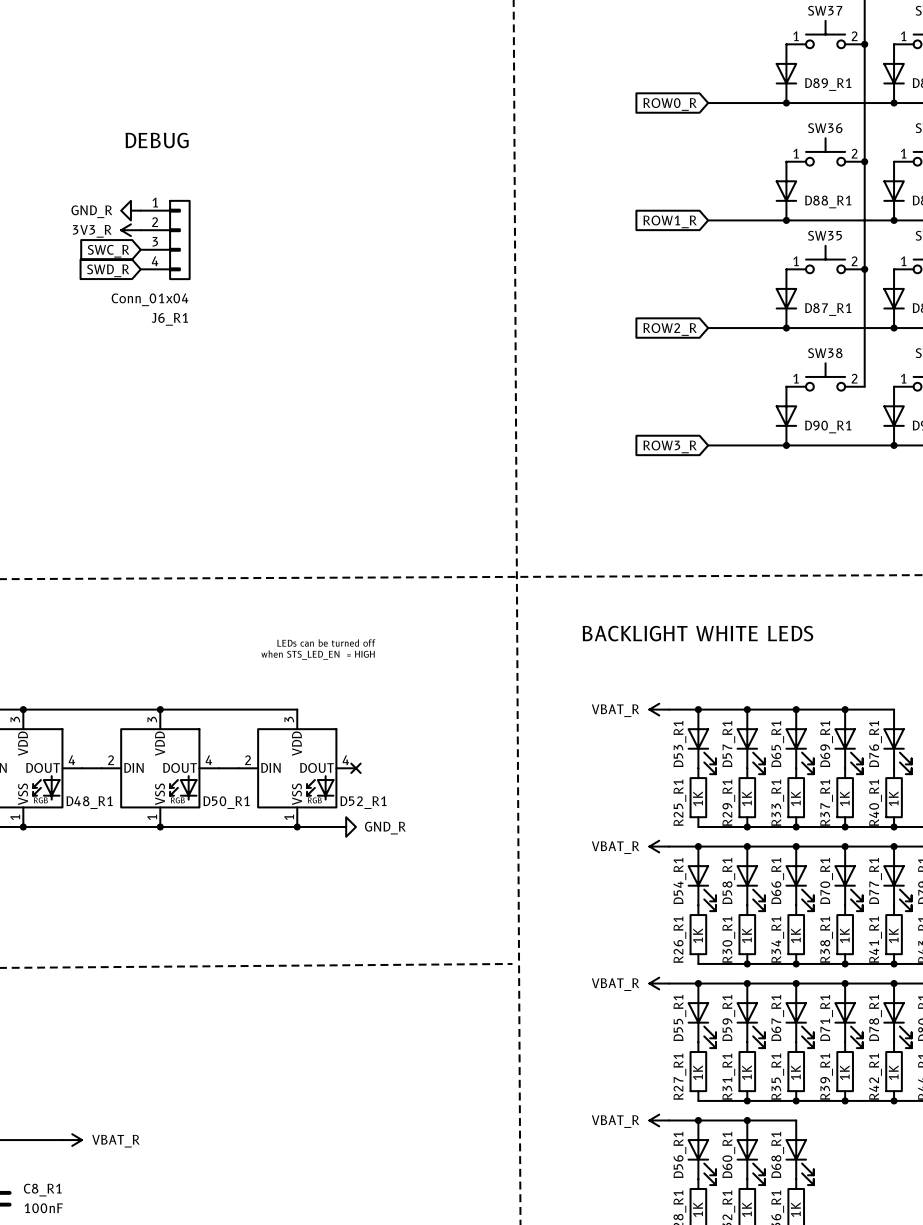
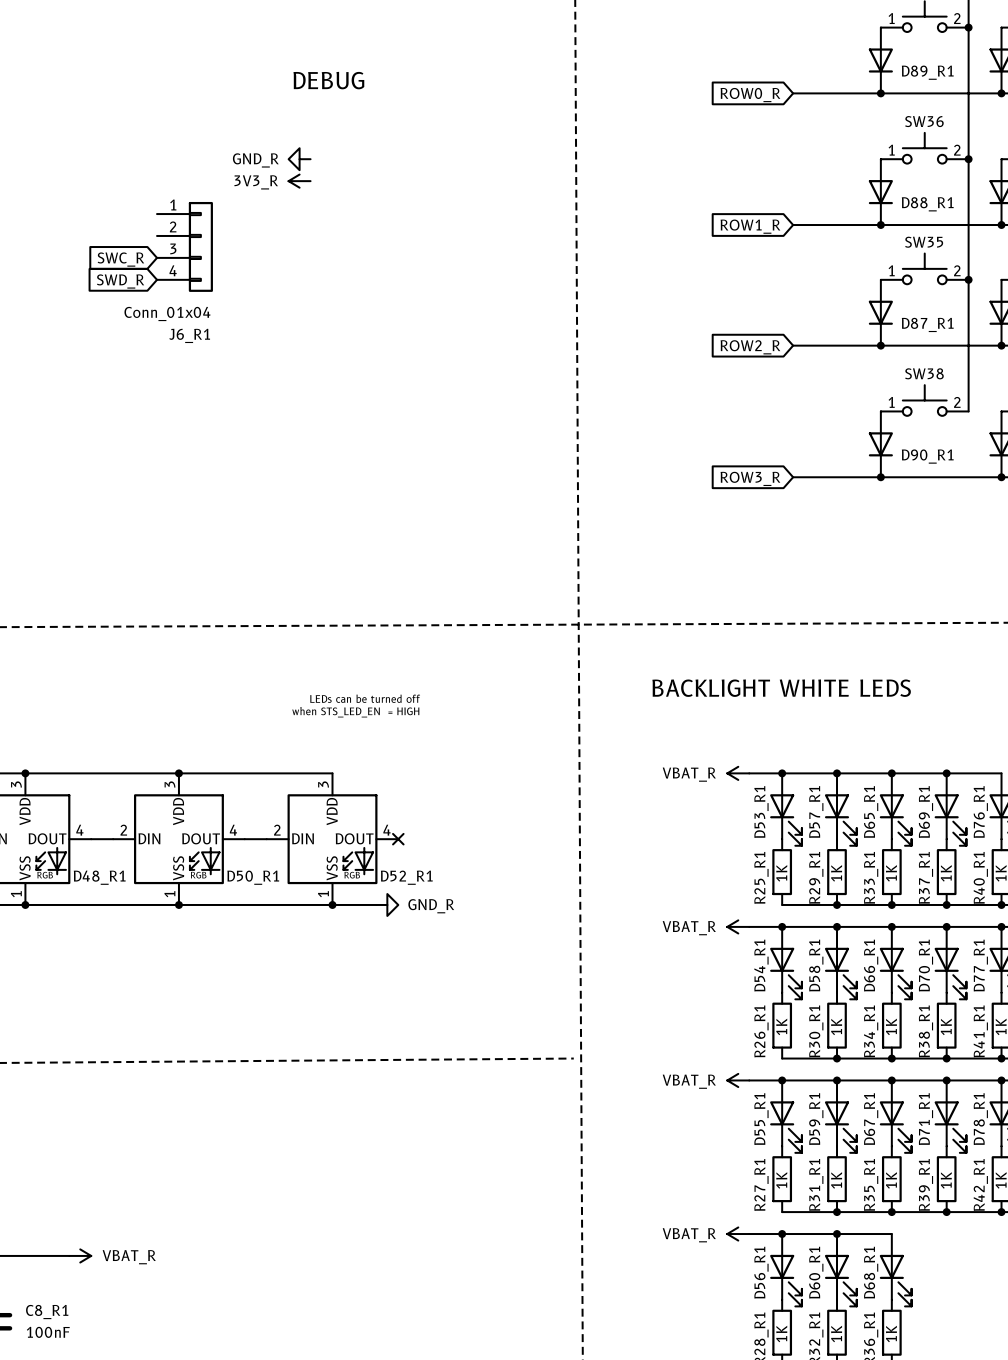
text position: DEBUG (157, 140) -> DEBUG (328, 80)
power symbol position: GND_R (130, 210) -> GND_R (299, 159)
power symbol position: 3V3_R (130, 230) -> 3V3_R (299, 181)

